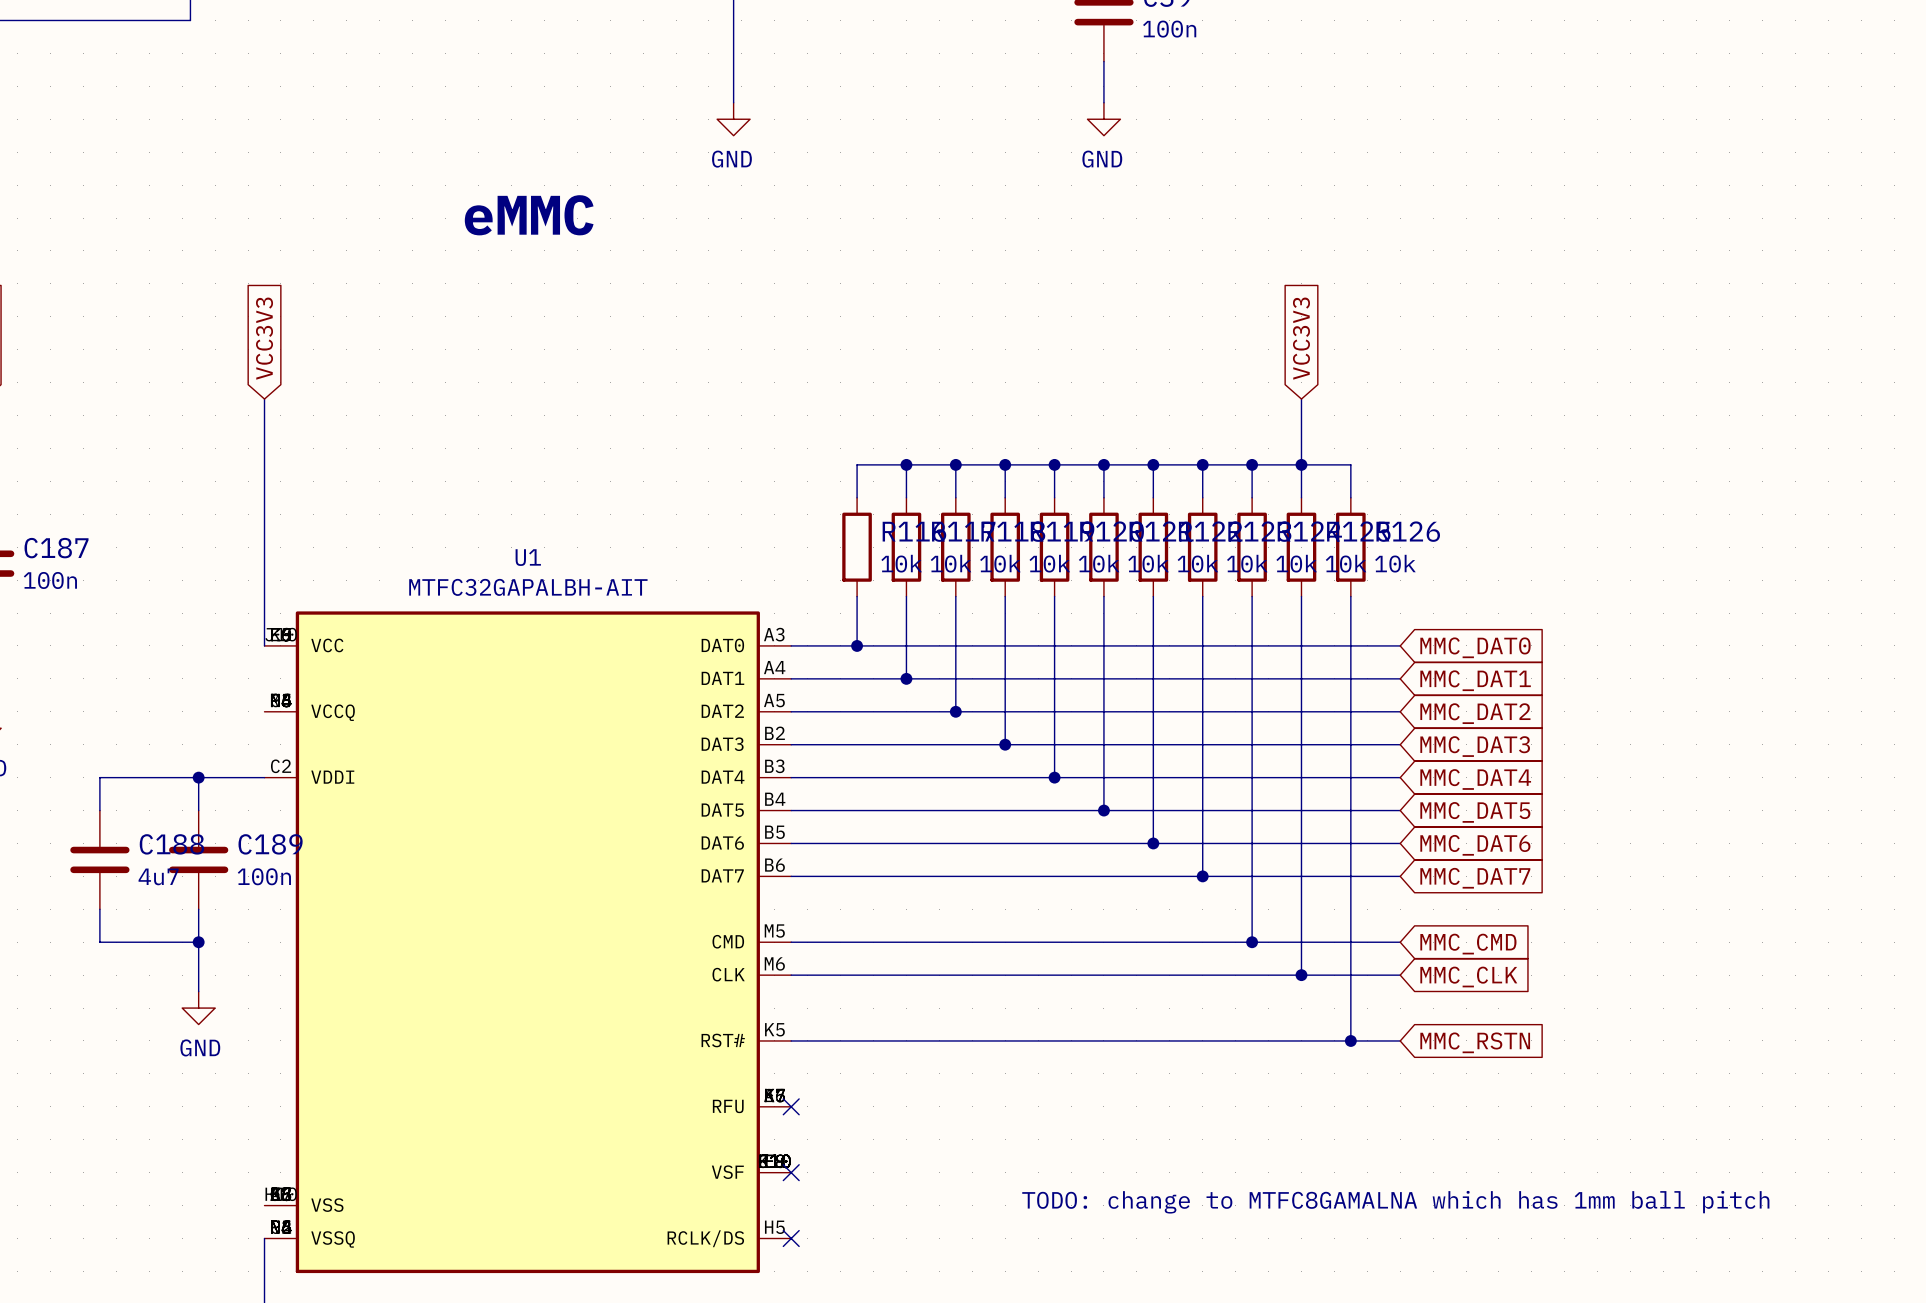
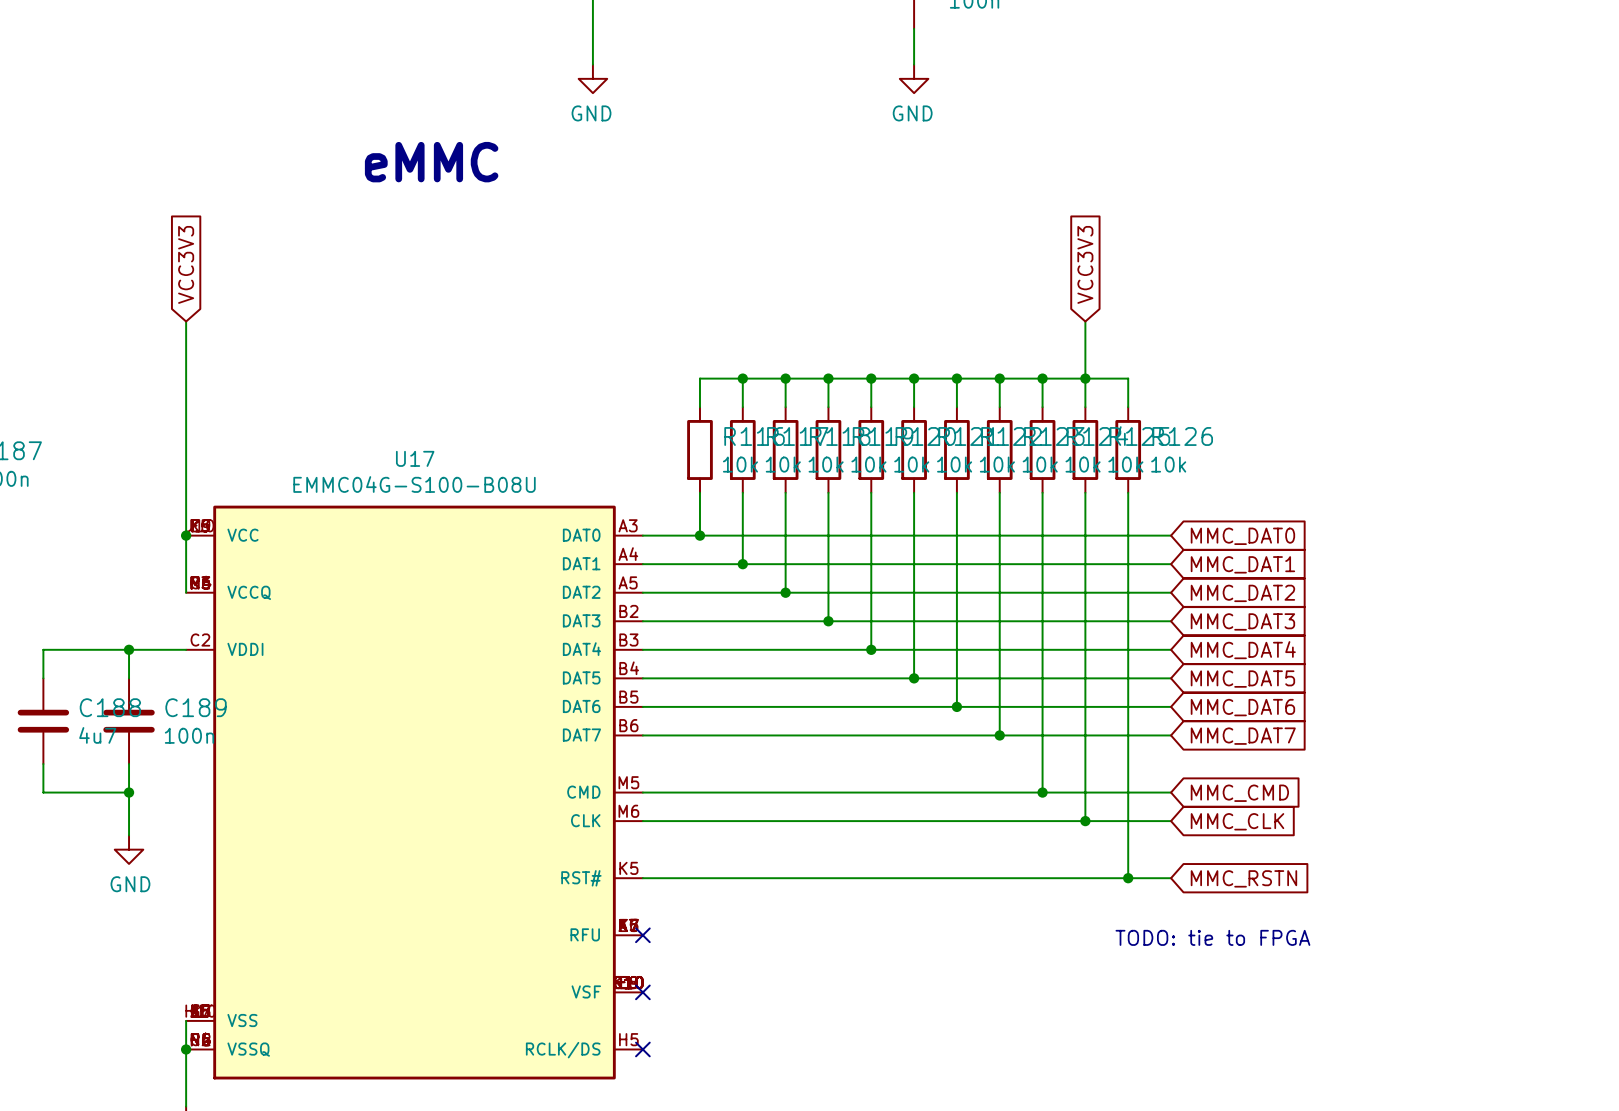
U1 name: U1 (528, 557) -> U17 (415, 458)
U1 value: MTFC32GAPALBH-AIT (528, 587) -> EMMC04G-S100-B08U (414, 484)
wire: none -> (186, 535) (186, 592)
junction: none -> (186, 535)
text: none -> TODO: tie to FPGA (1212, 937)
text: TODO: change to MTFC8GAMALNA which has 1mm ball pitch (1395, 1202) -> none
wire: none -> (186, 1020) (186, 1049)
junction: none -> (186, 1049)

